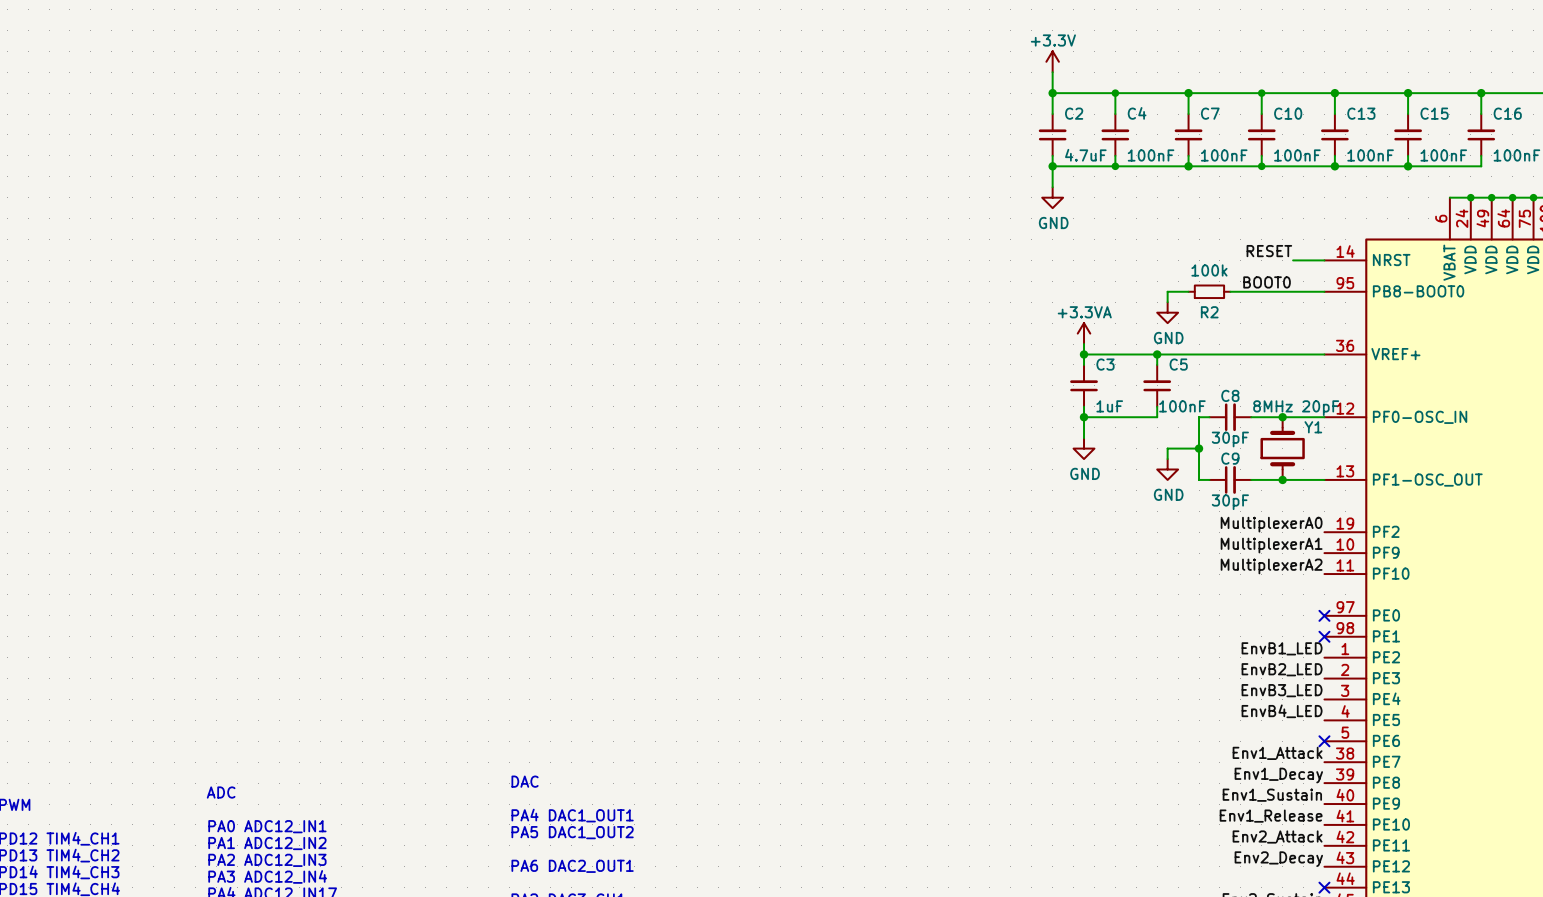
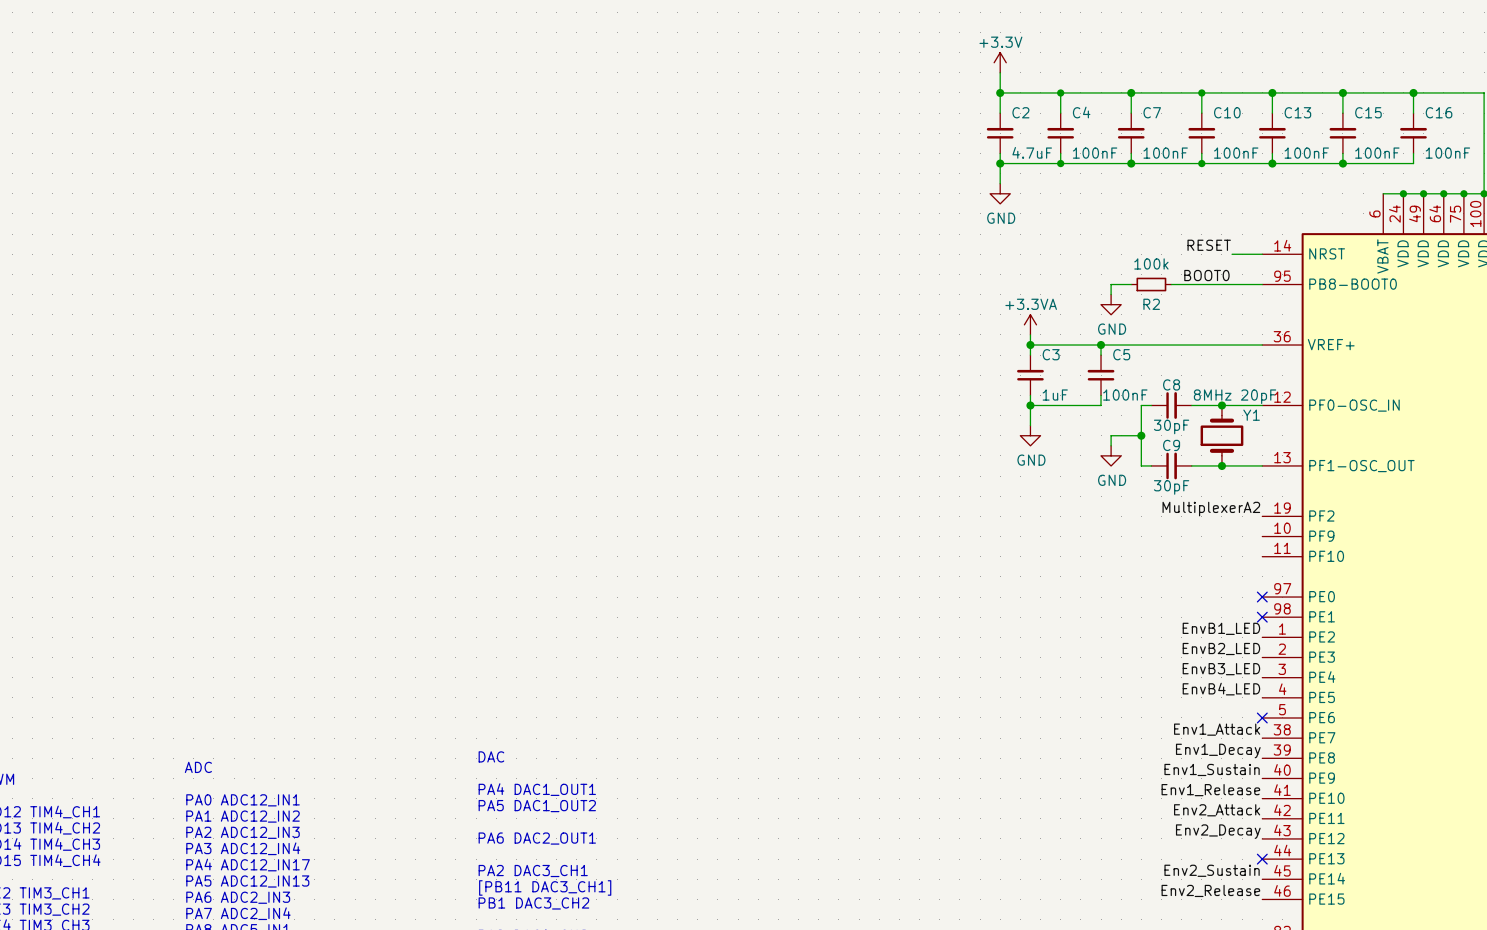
label: MultiplexerA0 (1271, 524) -> MultiplexerA2 (1211, 509)
label: MultiplexerA1 (1271, 545) -> none
label: MultiplexerA2 (1271, 566) -> none

